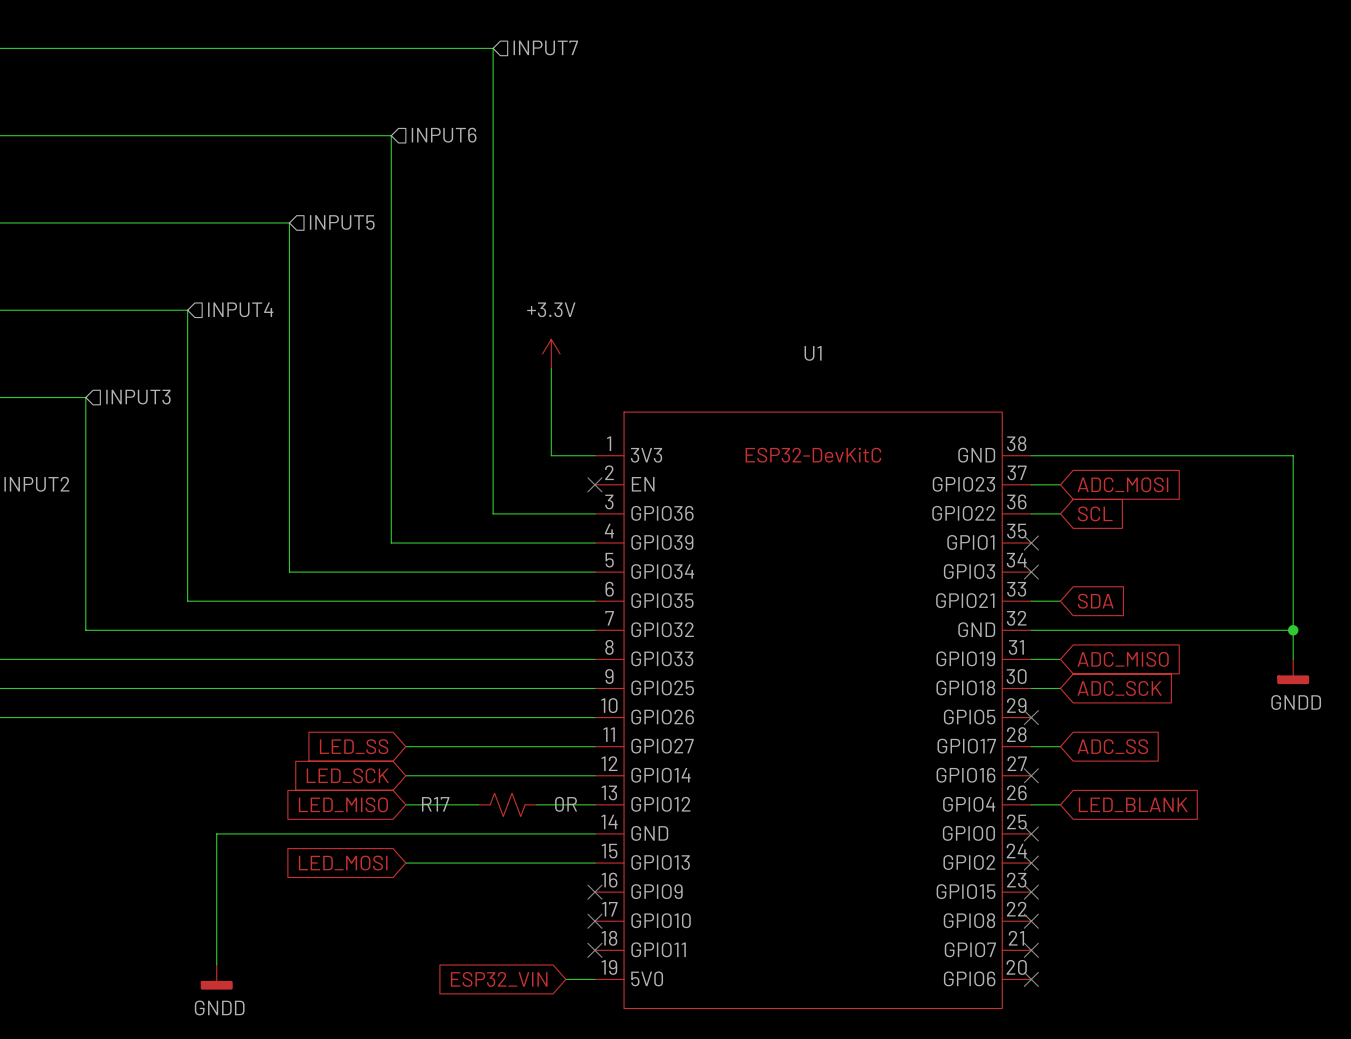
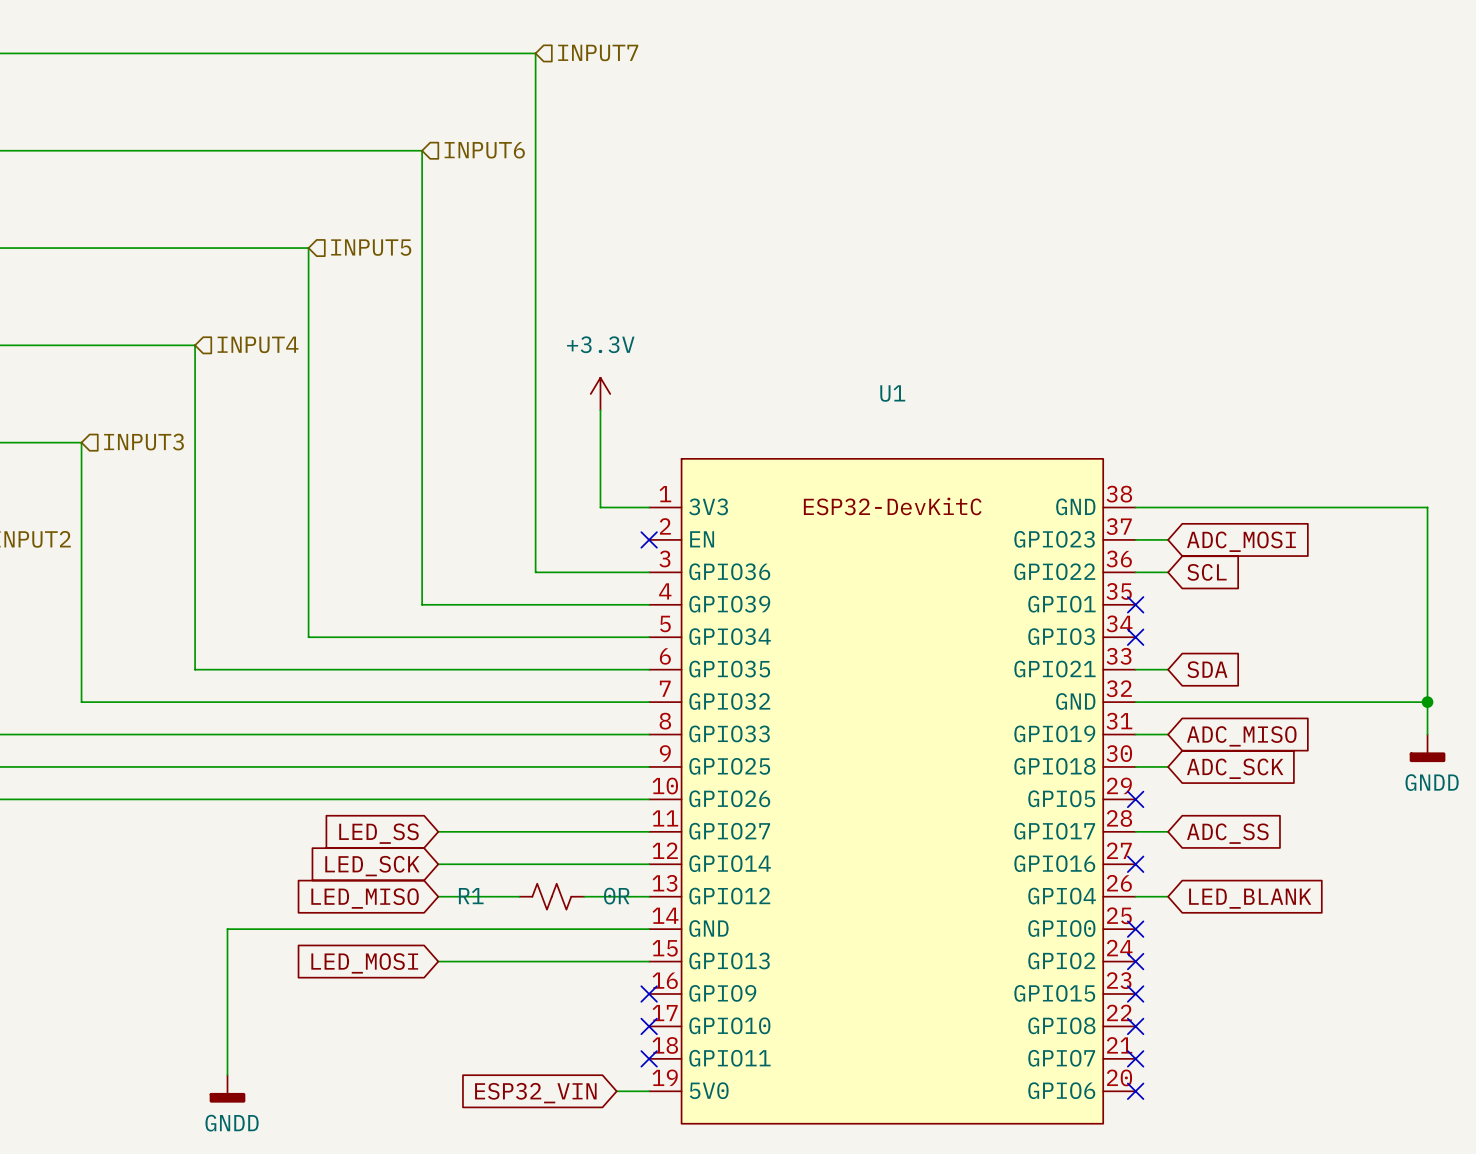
R17 name: R17 (435, 804) -> R1 (471, 896)

